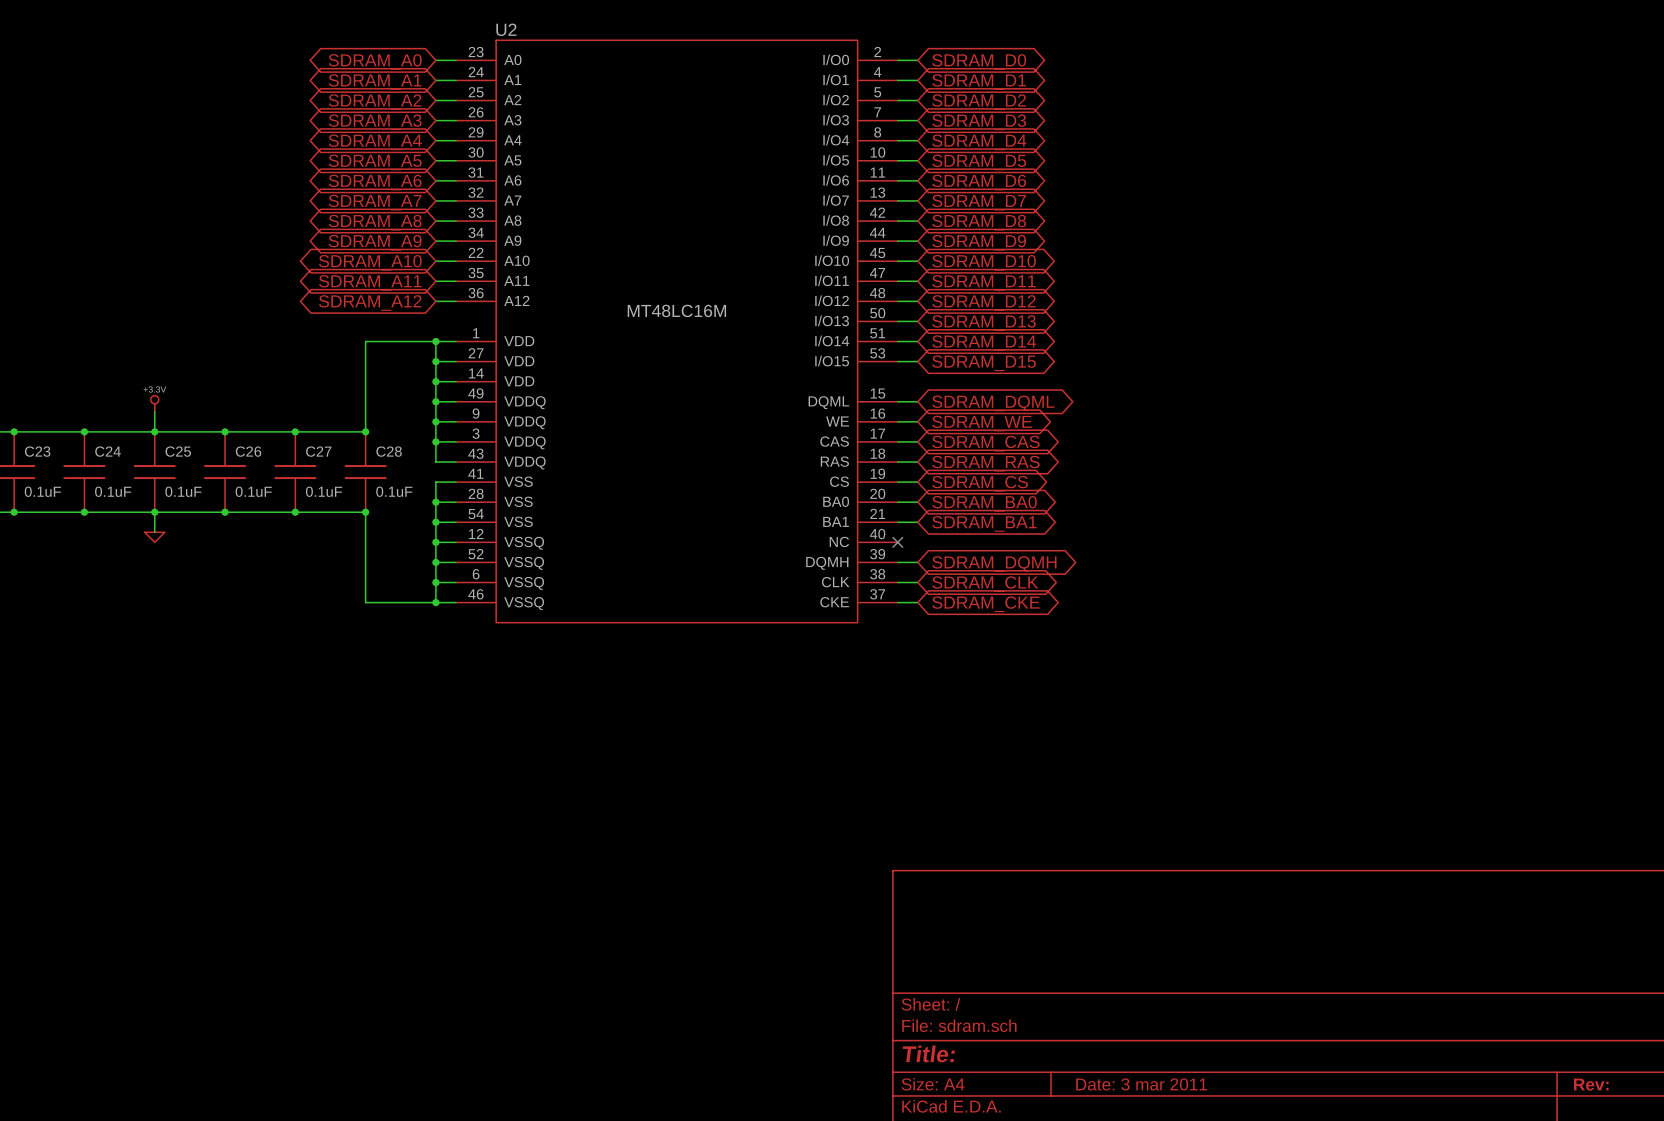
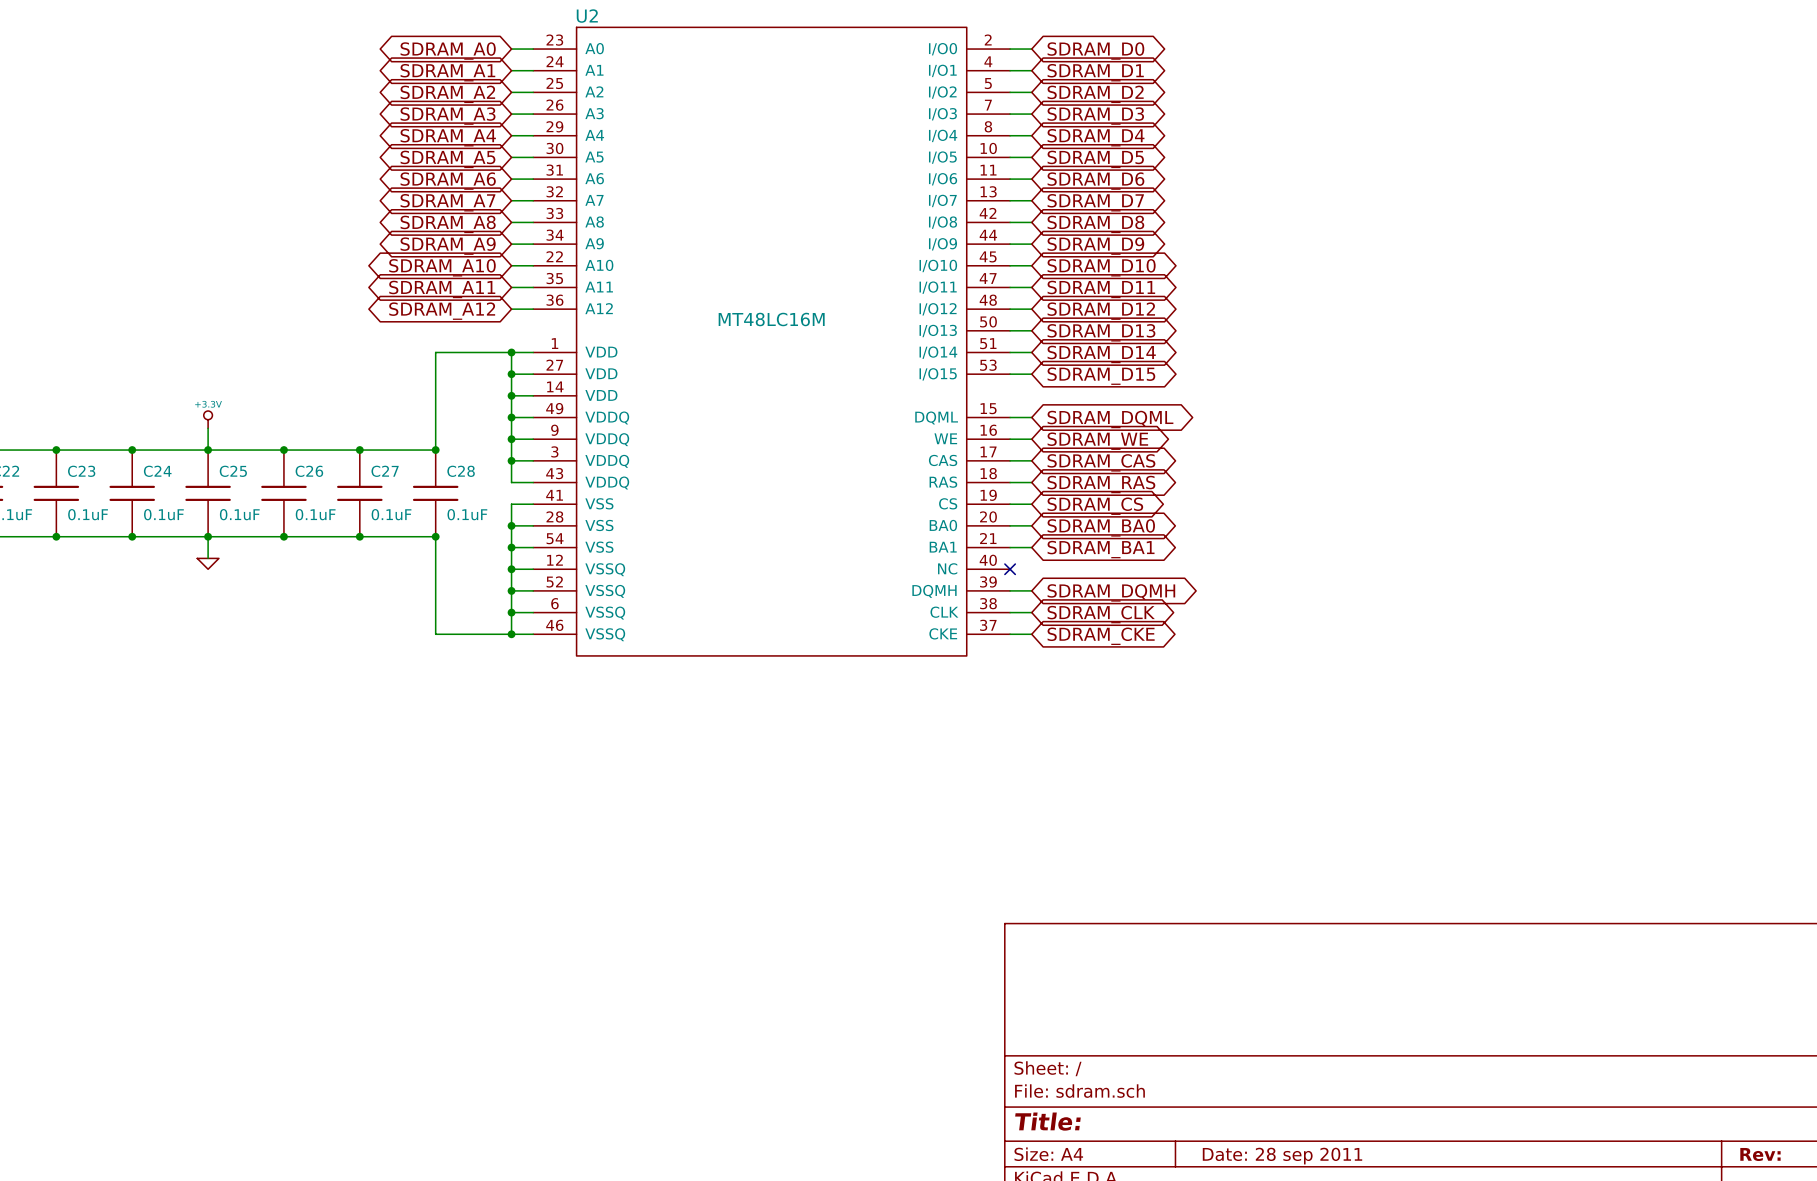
title block: Date: 3 mar 2011 (1141, 1084) -> Date: 28 sep 2011 (1282, 1156)

